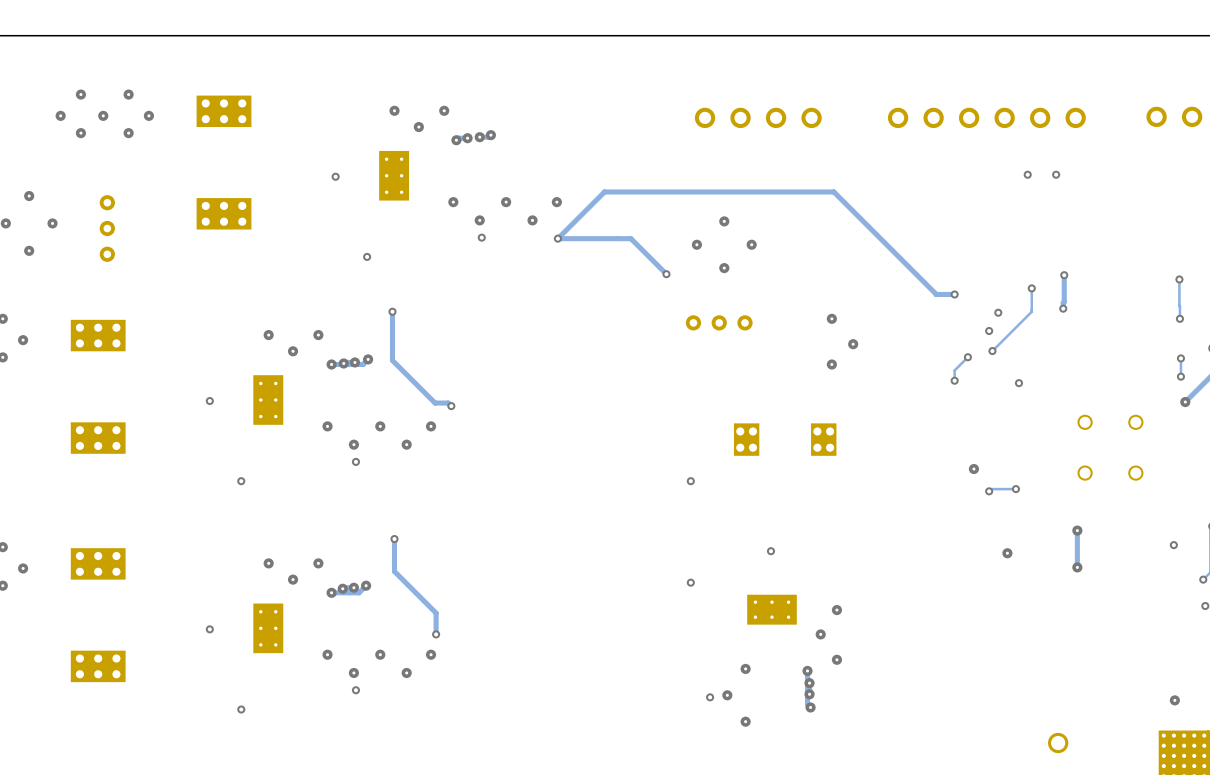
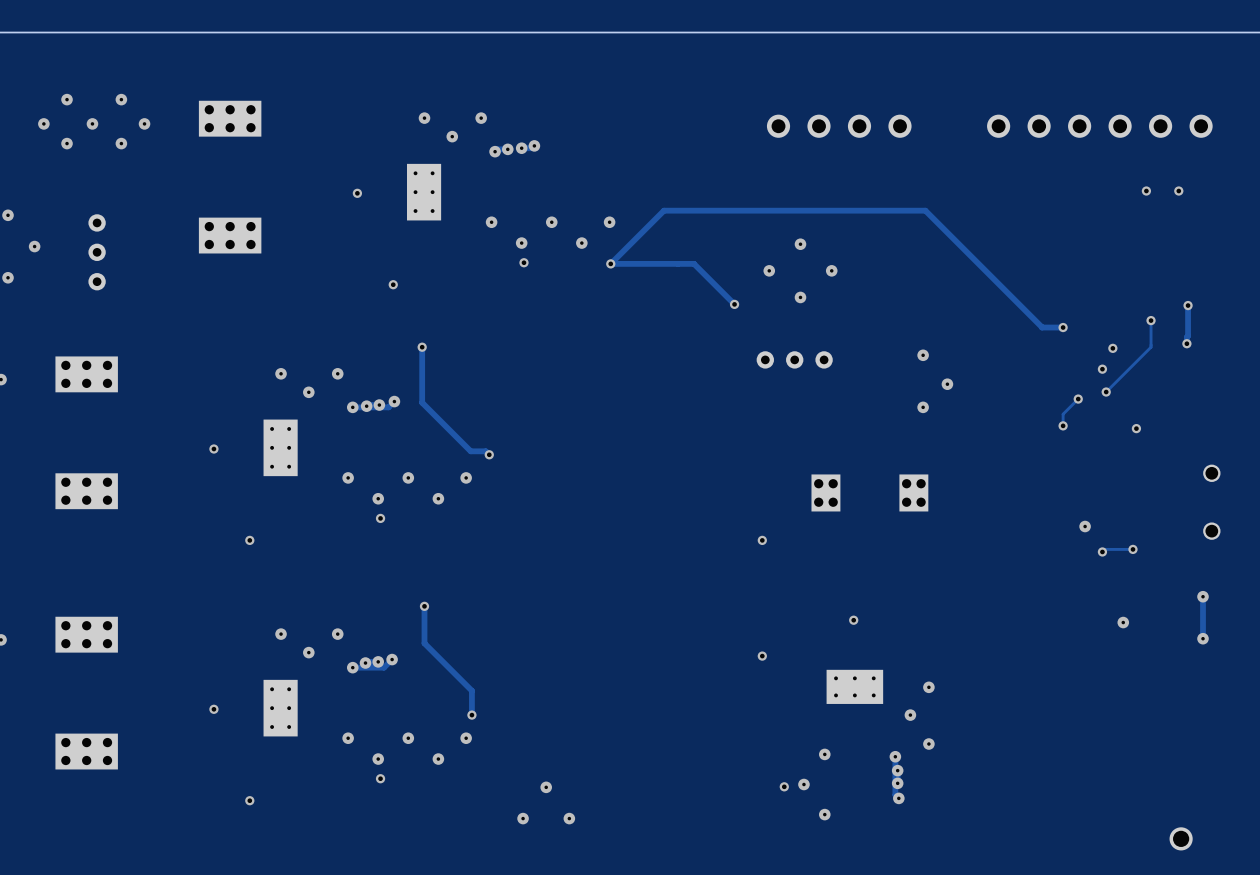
via: none -> (546, 787)
via: none -> (523, 818)
via: none -> (569, 818)

